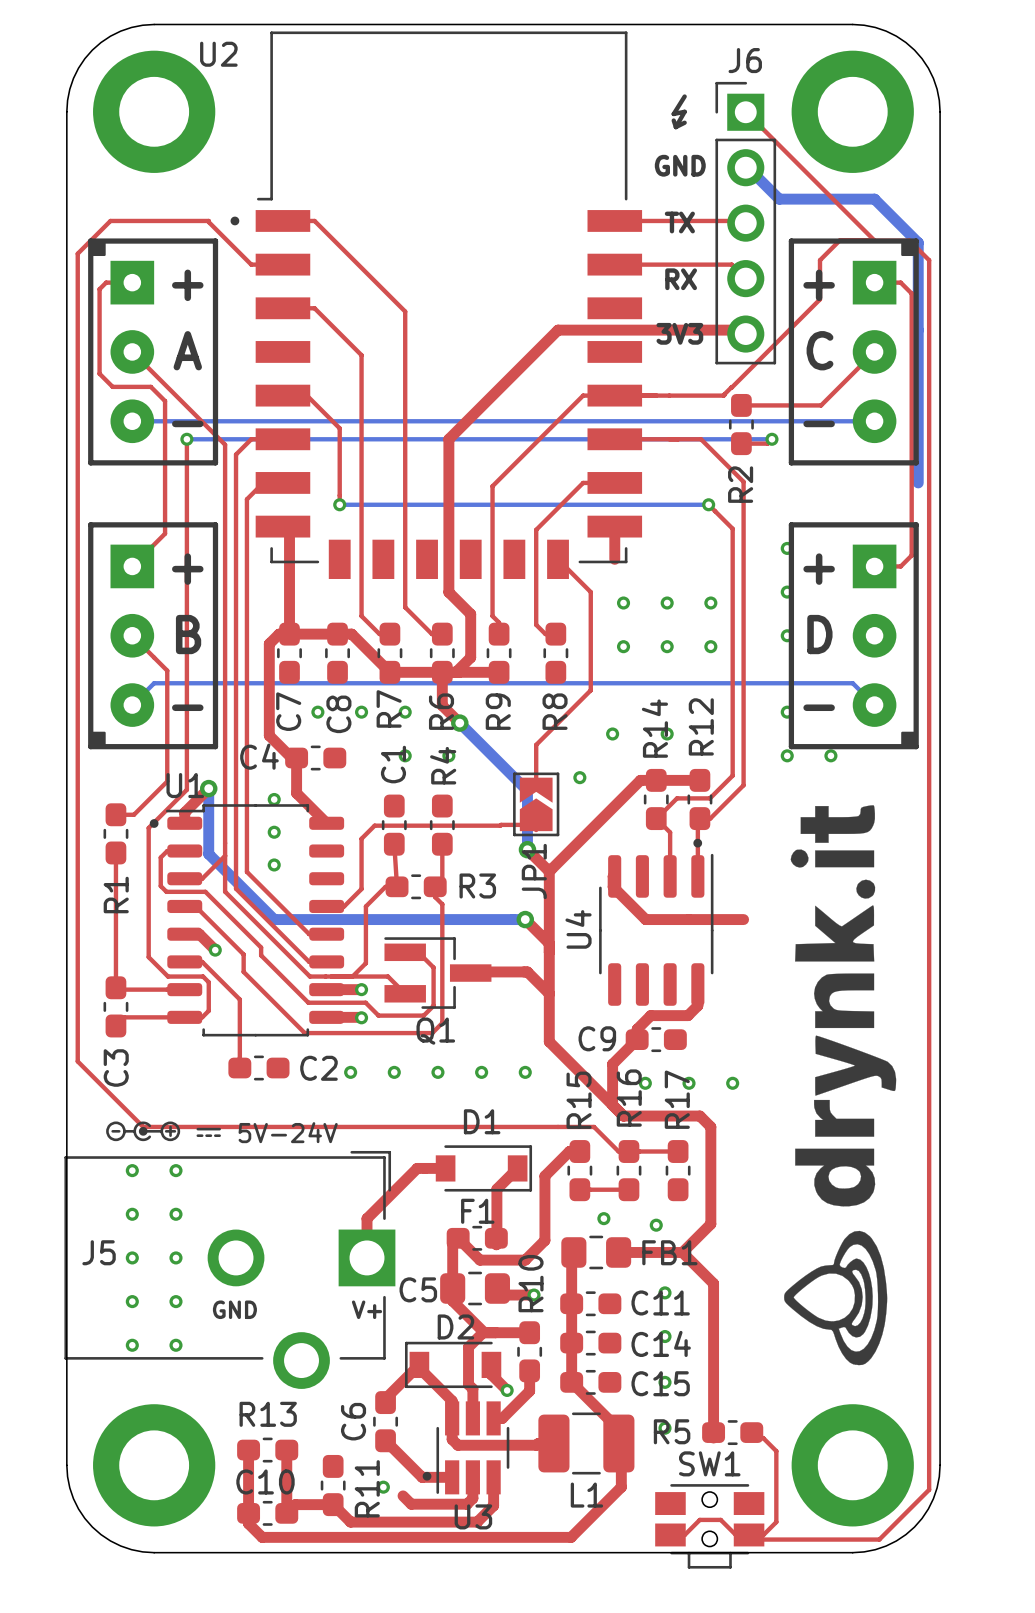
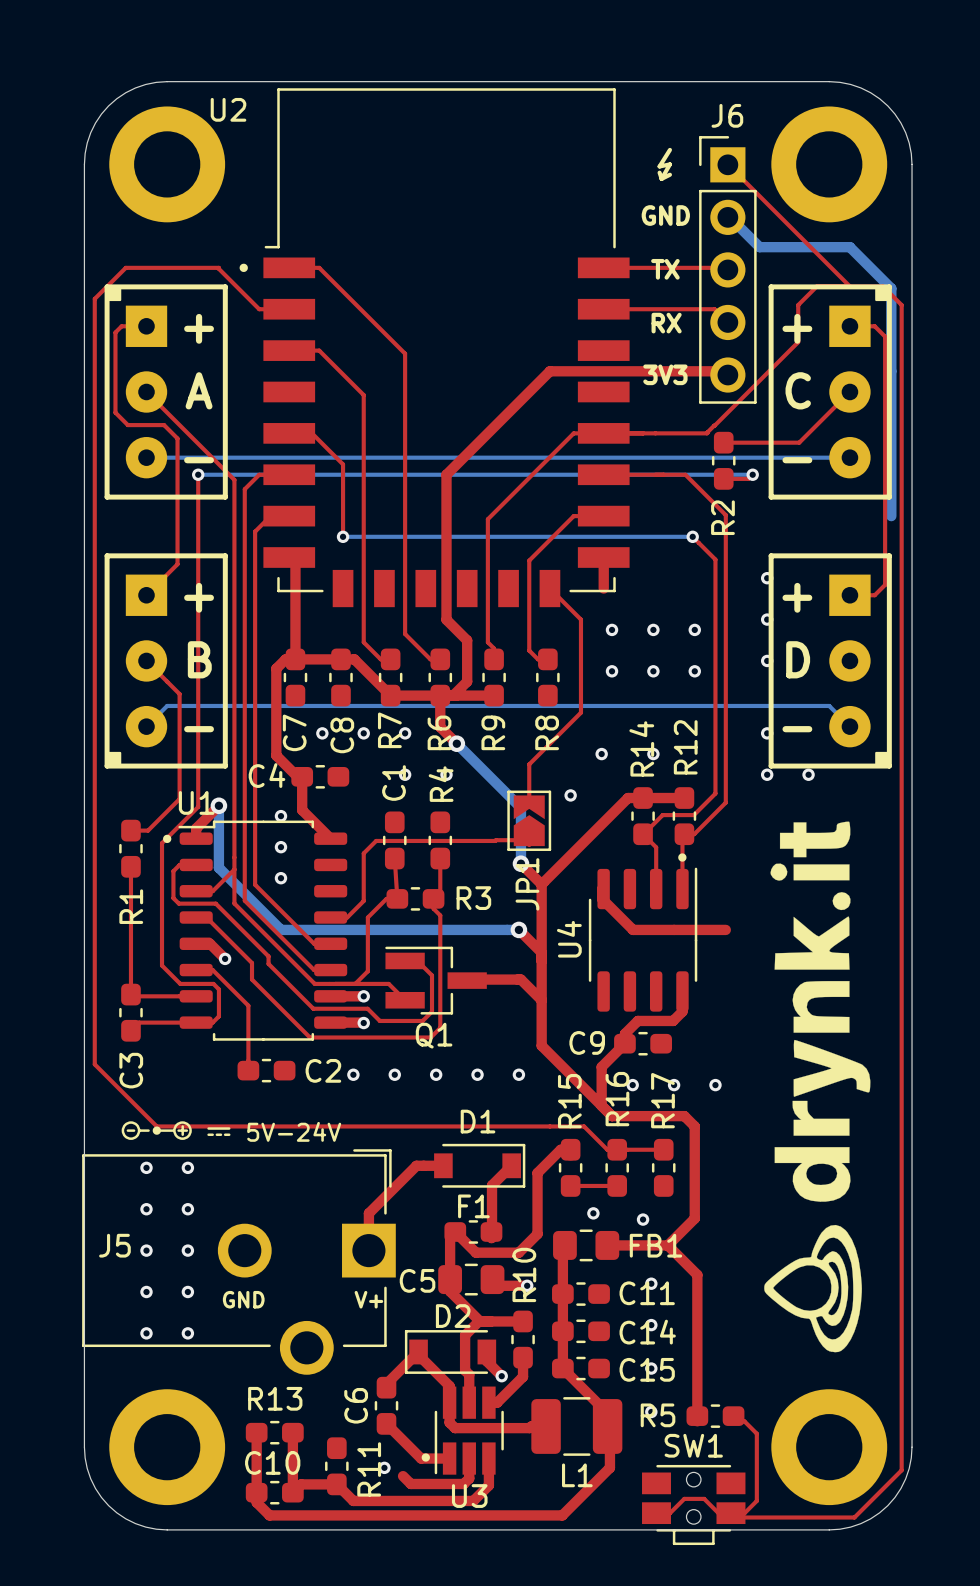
line: (149, 1125) (140, 1123) (136, 1126) (134, 1131) (139, 1139) (145, 1139) (149, 1136) -> none

